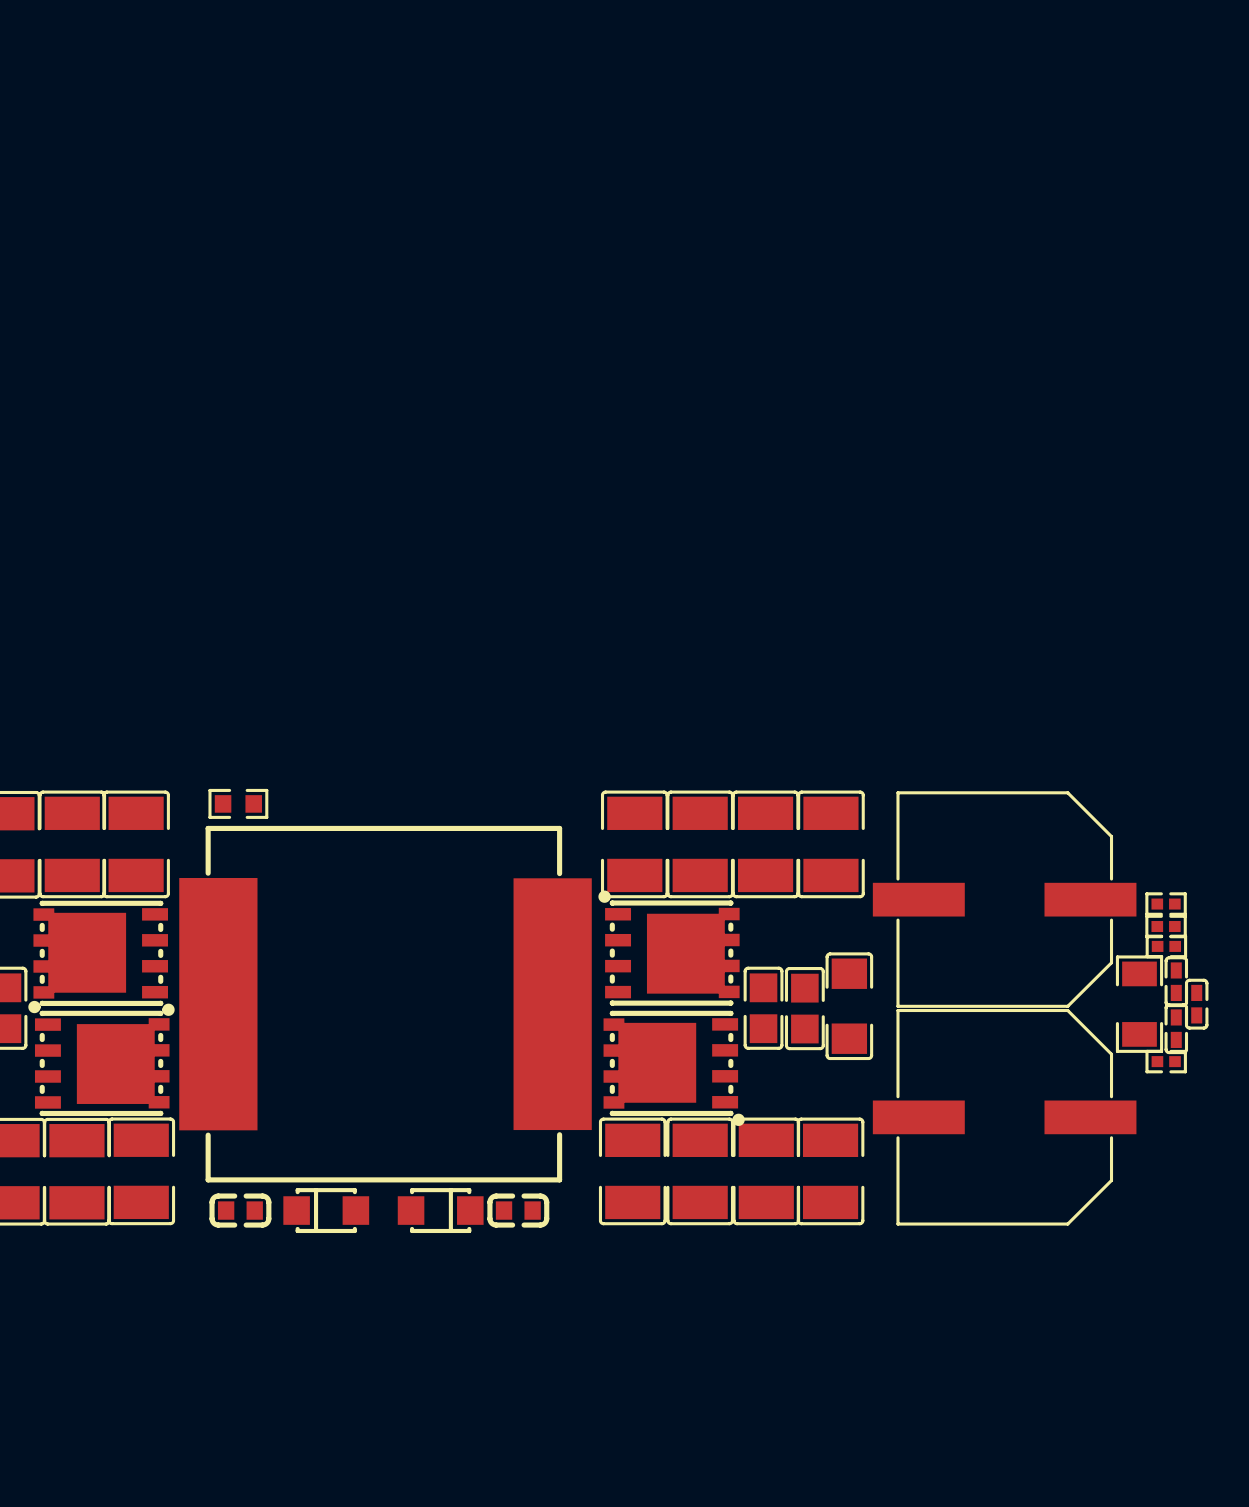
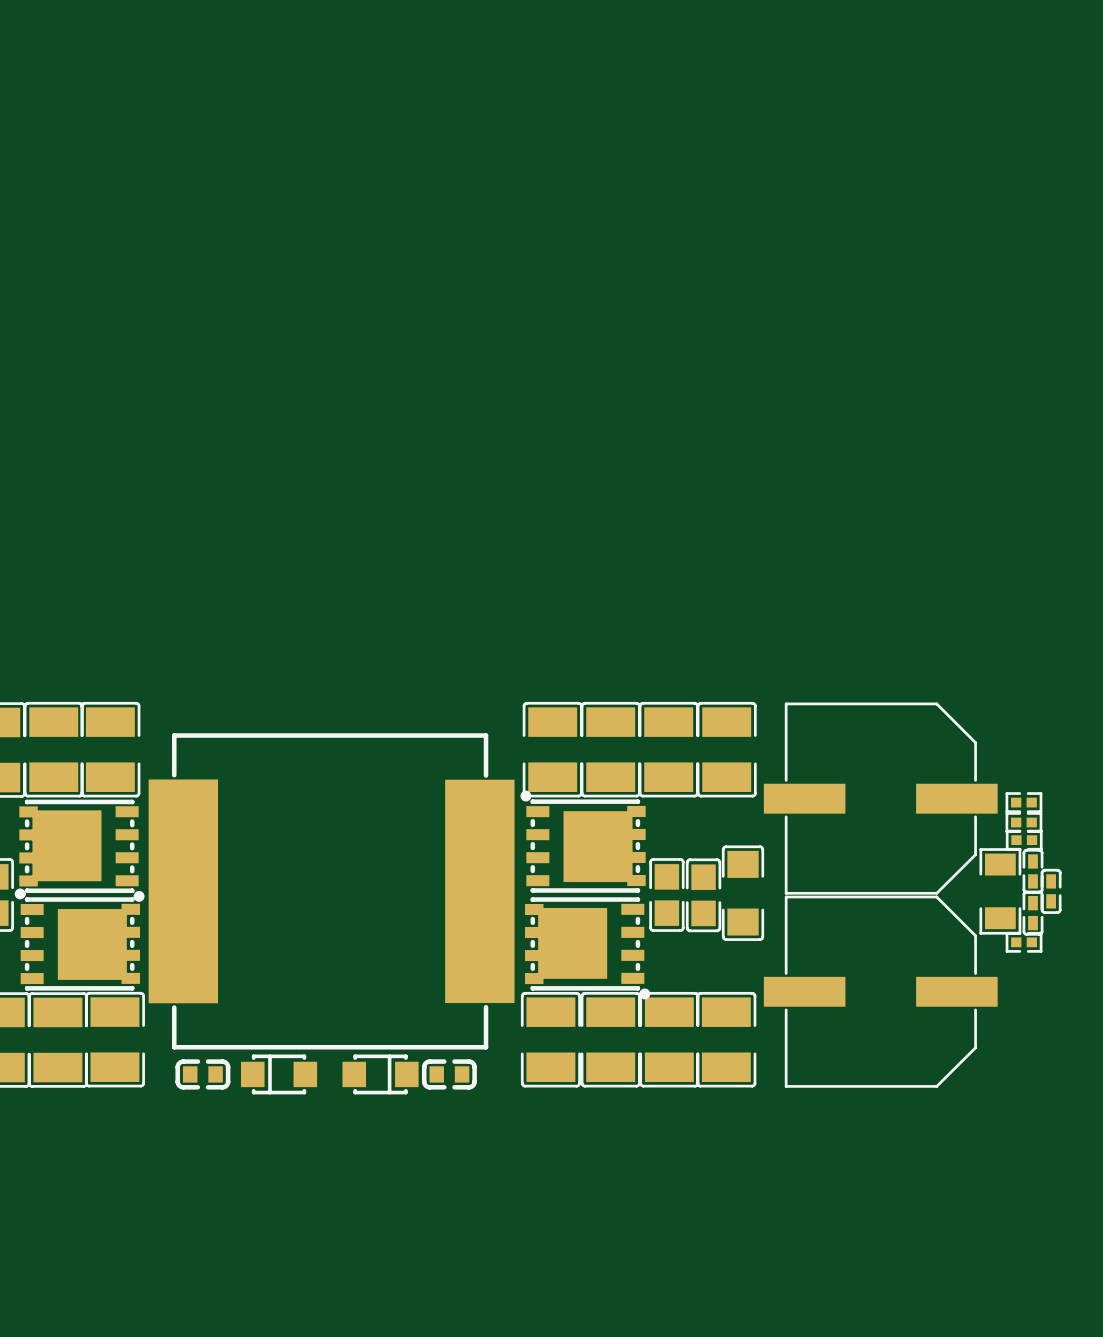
part: (238, 803) -> none

